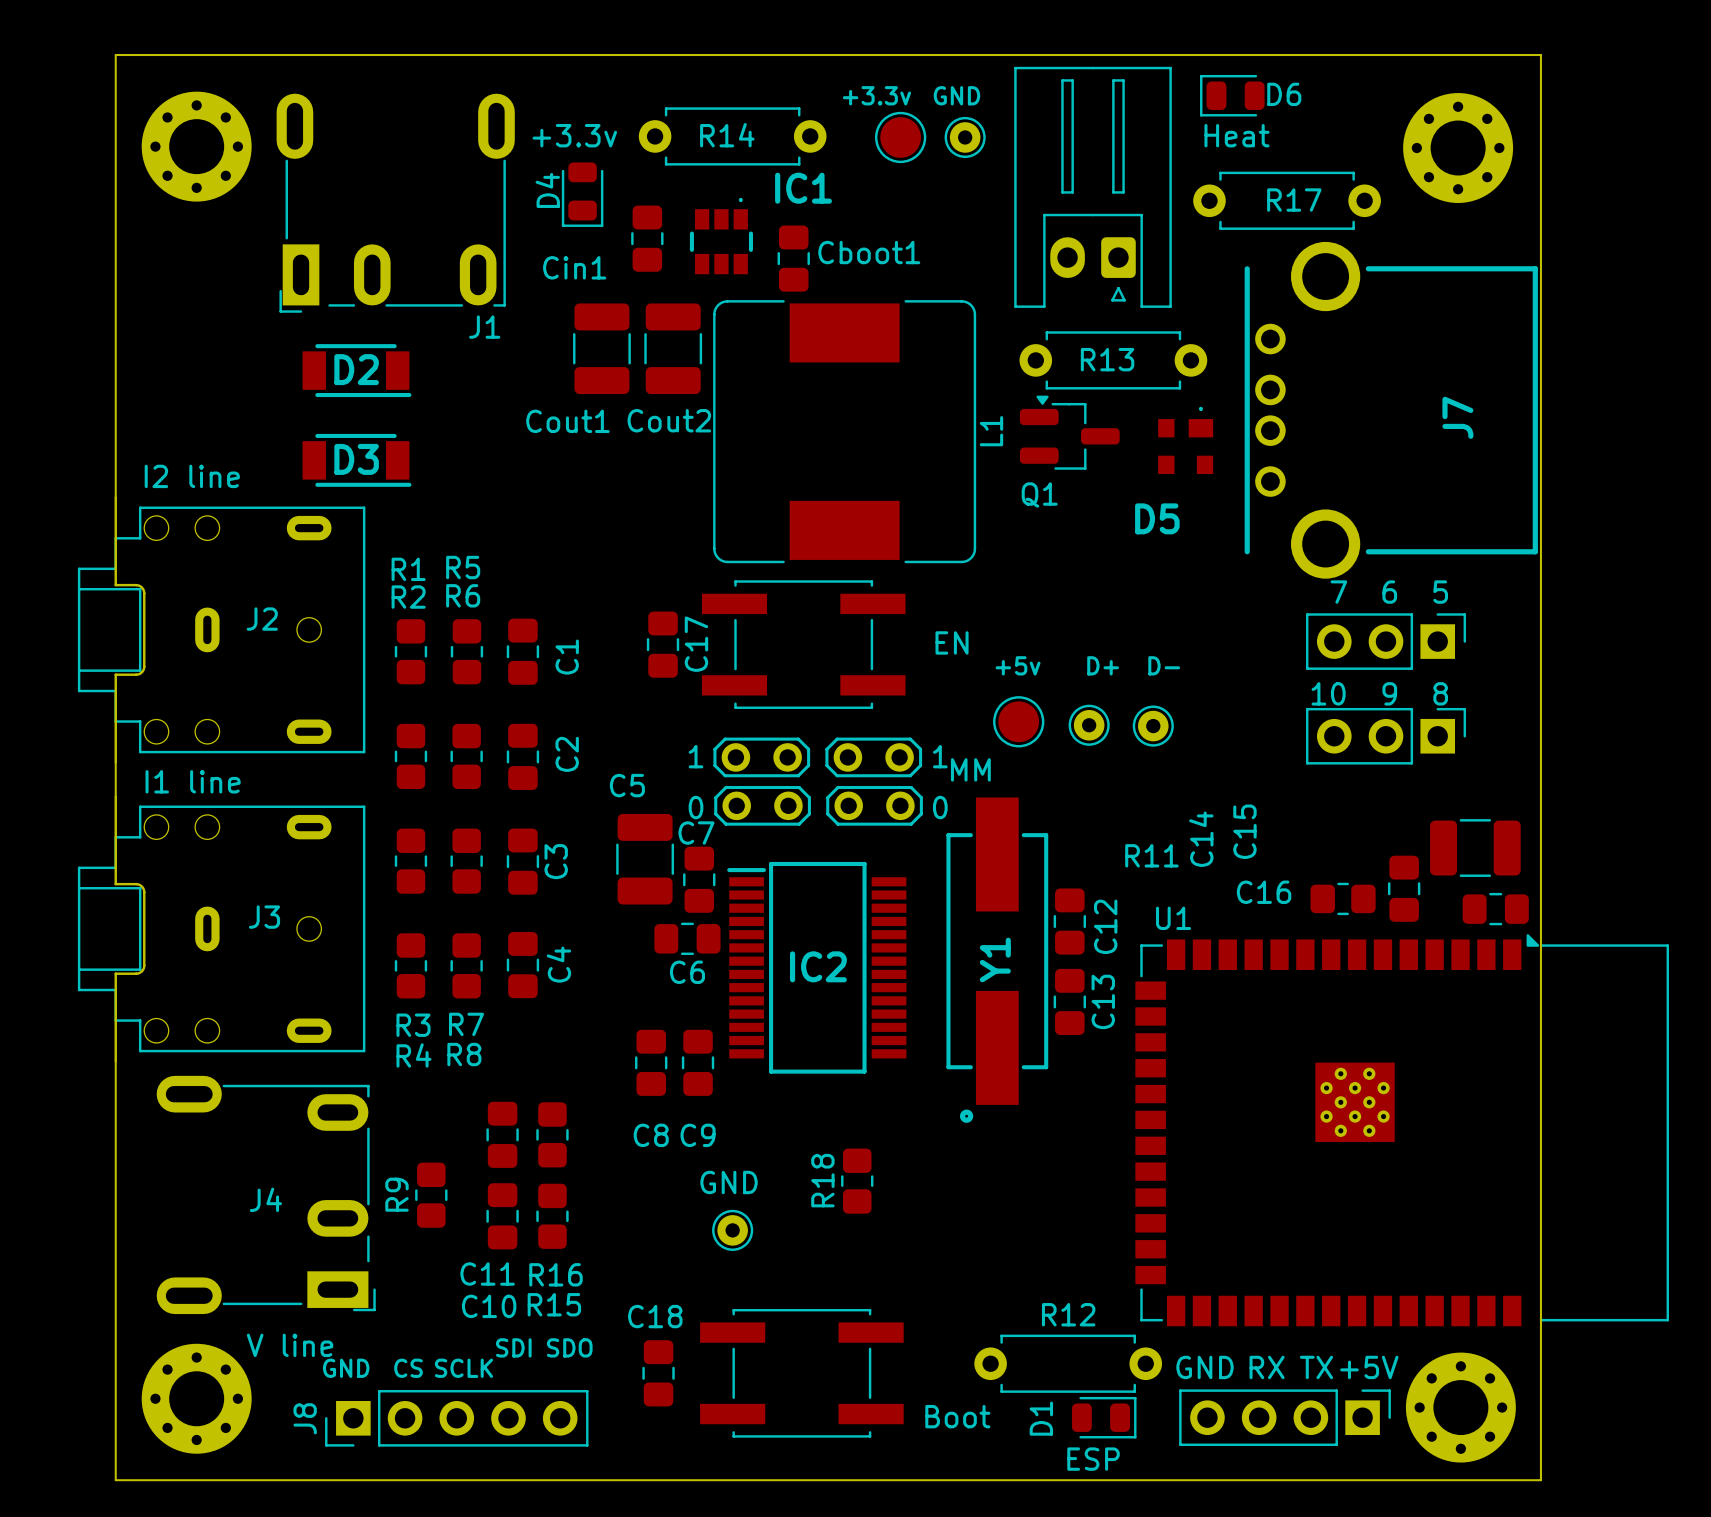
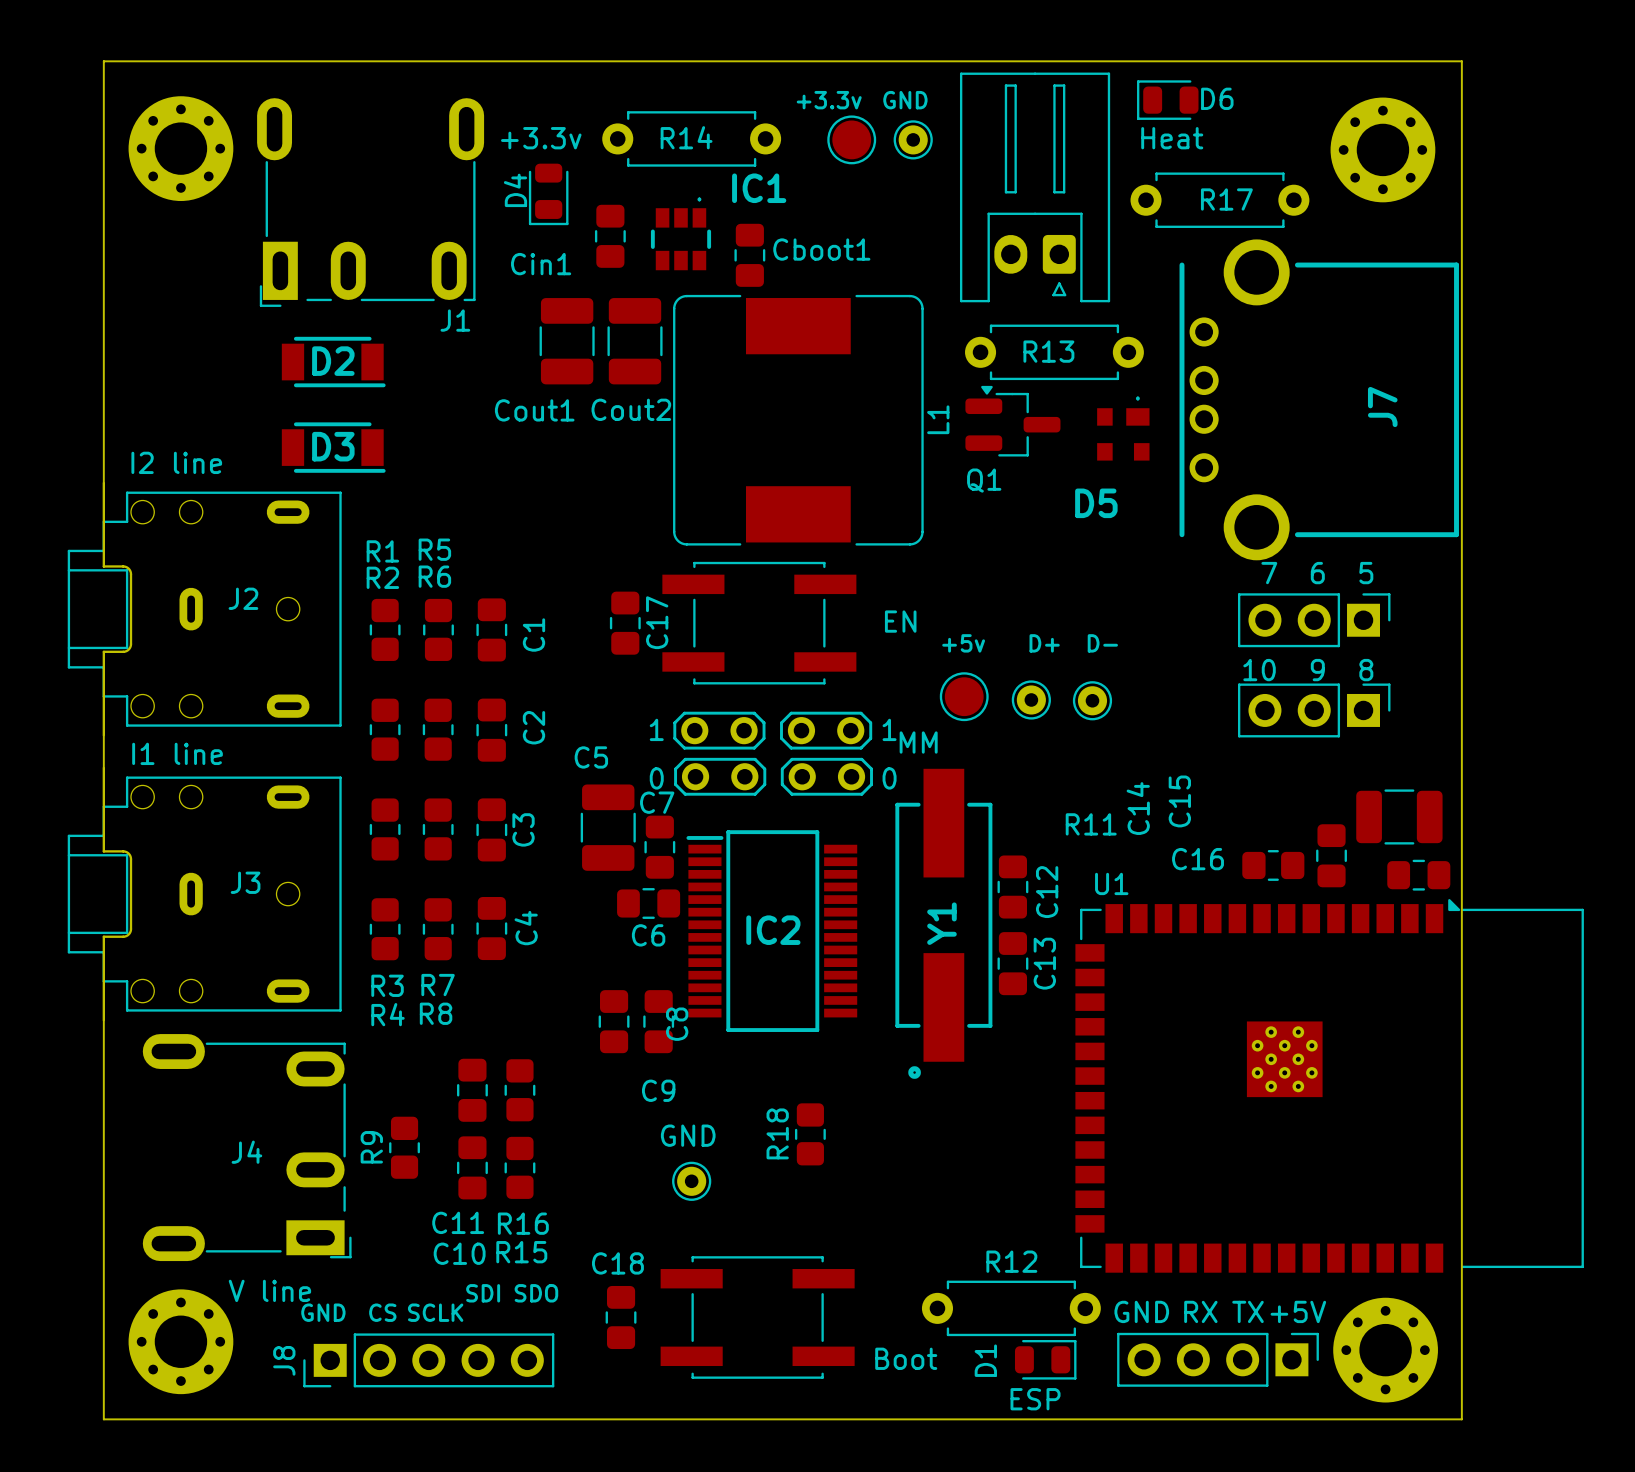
C8 name rotation: 0° (651, 1135) -> 90° counterclockwise (677, 1024)
C8 name position: C8 (651, 1135) -> C8 (677, 1024)

